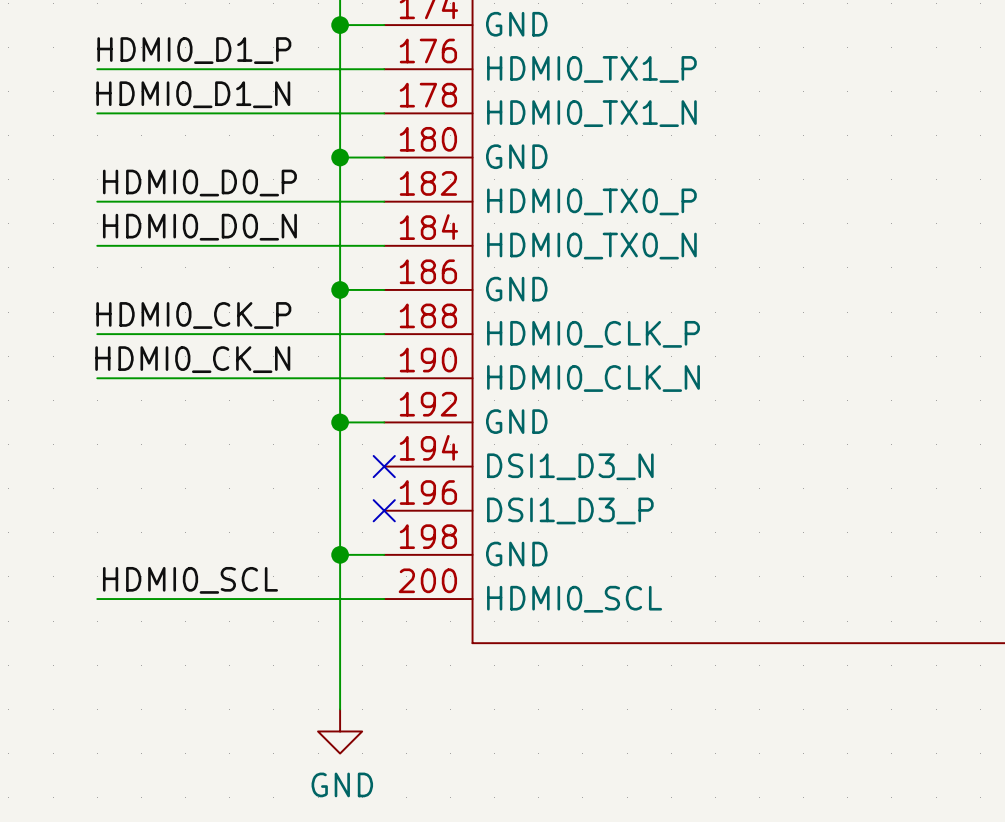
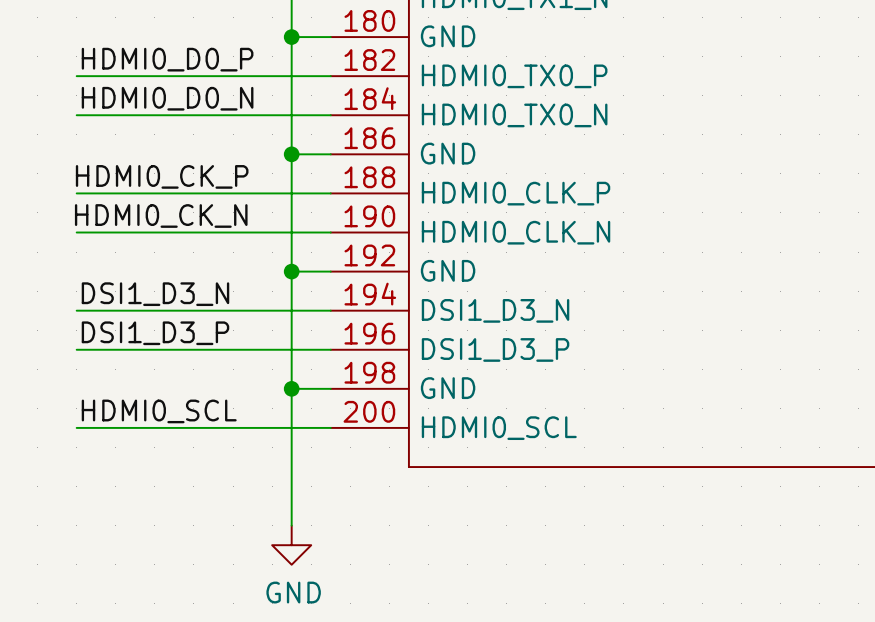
label: none -> DSI1_D3_N (155, 294)
wire: none -> (76, 310) (330, 310)
no-connect mark: (384, 466) -> none
label: none -> DSI1_D3_P (155, 333)
wire: none -> (76, 349) (330, 349)
no-connect mark: (384, 510) -> none

